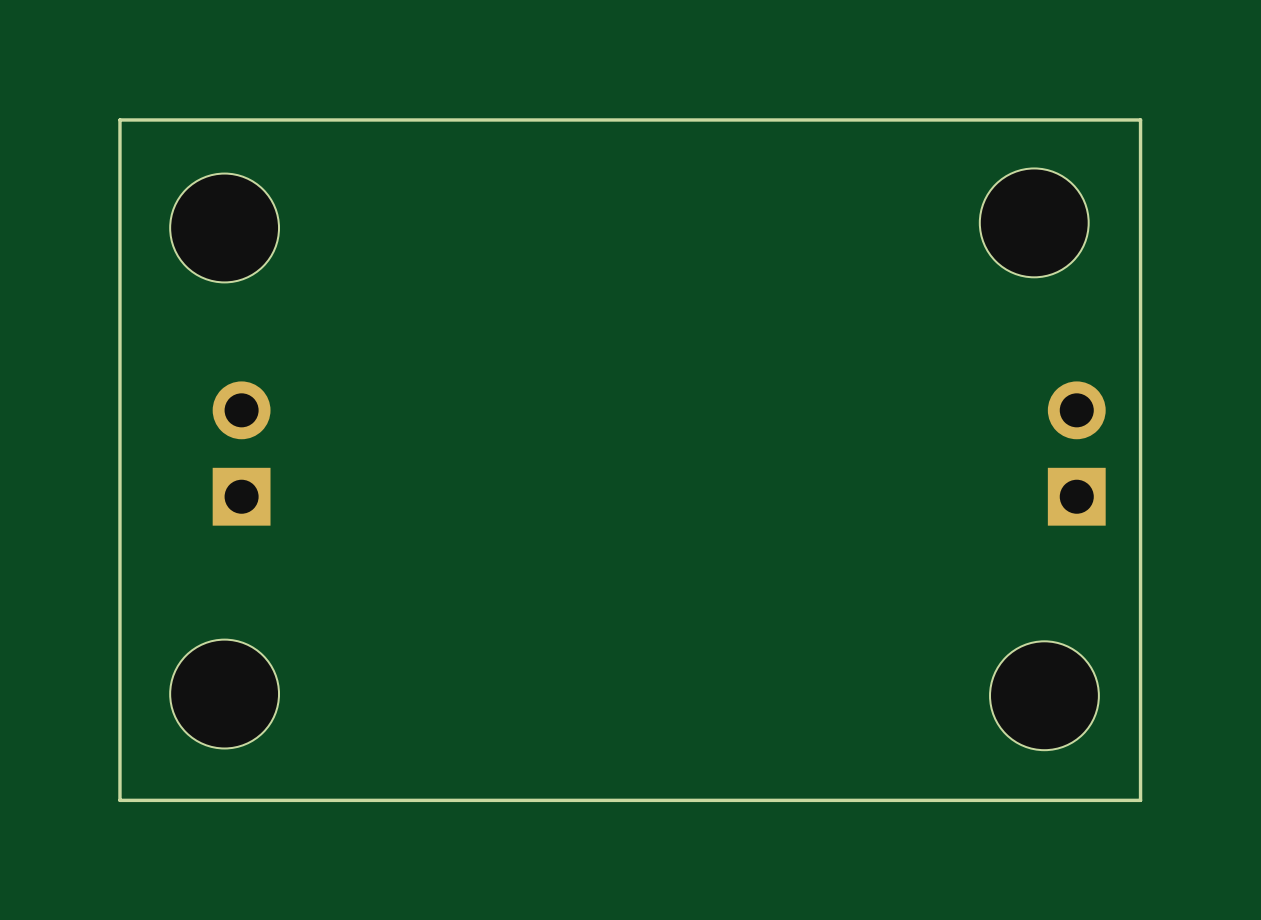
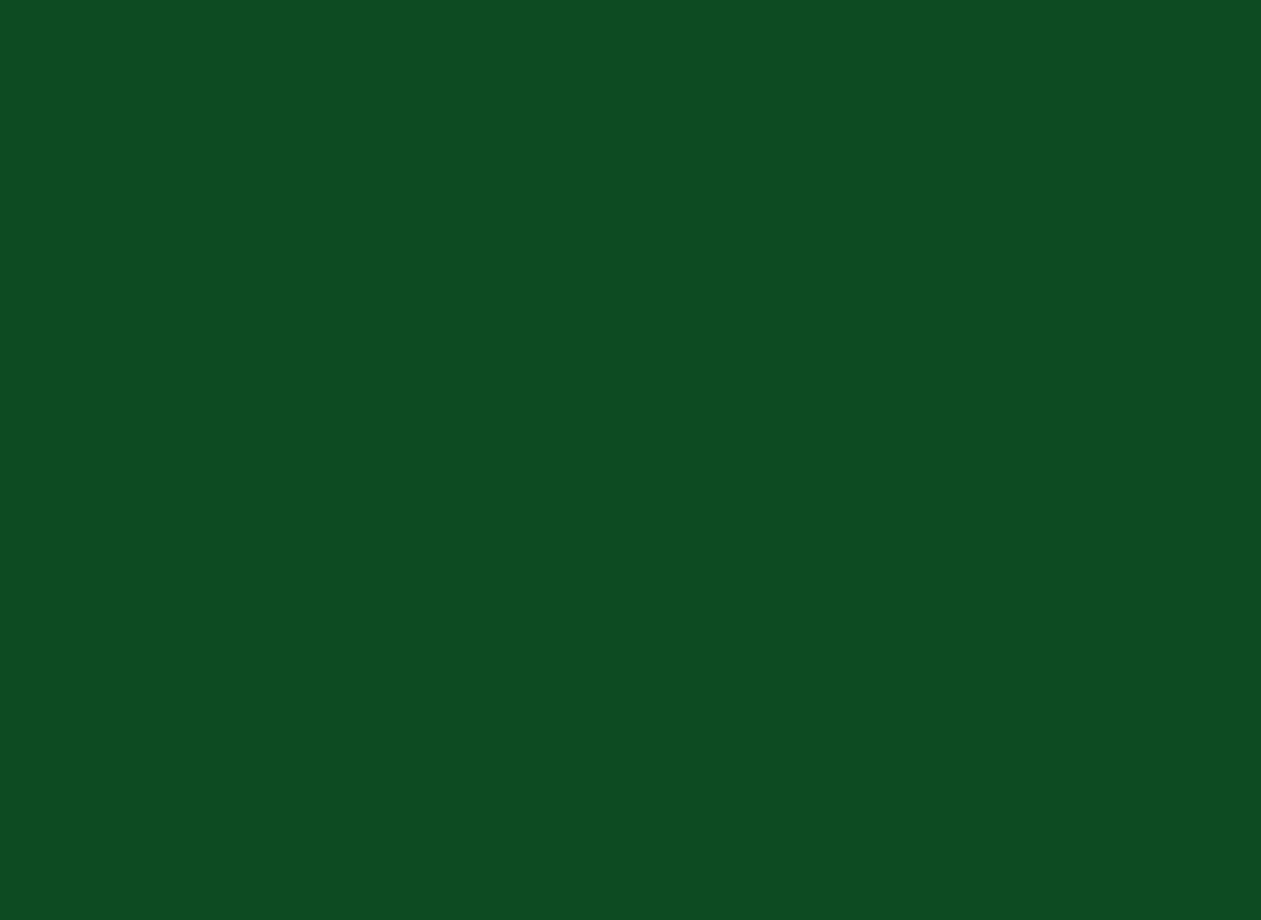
board edge: (1140, 119) (119, 119) (119, 800) (1140, 800) (1140, 119) -> none
part: (1034, 222) -> none
part: (224, 227) -> none
part: (241, 453) -> none
part: (1076, 453) -> none
part: (224, 694) -> none
part: (1044, 695) -> none

